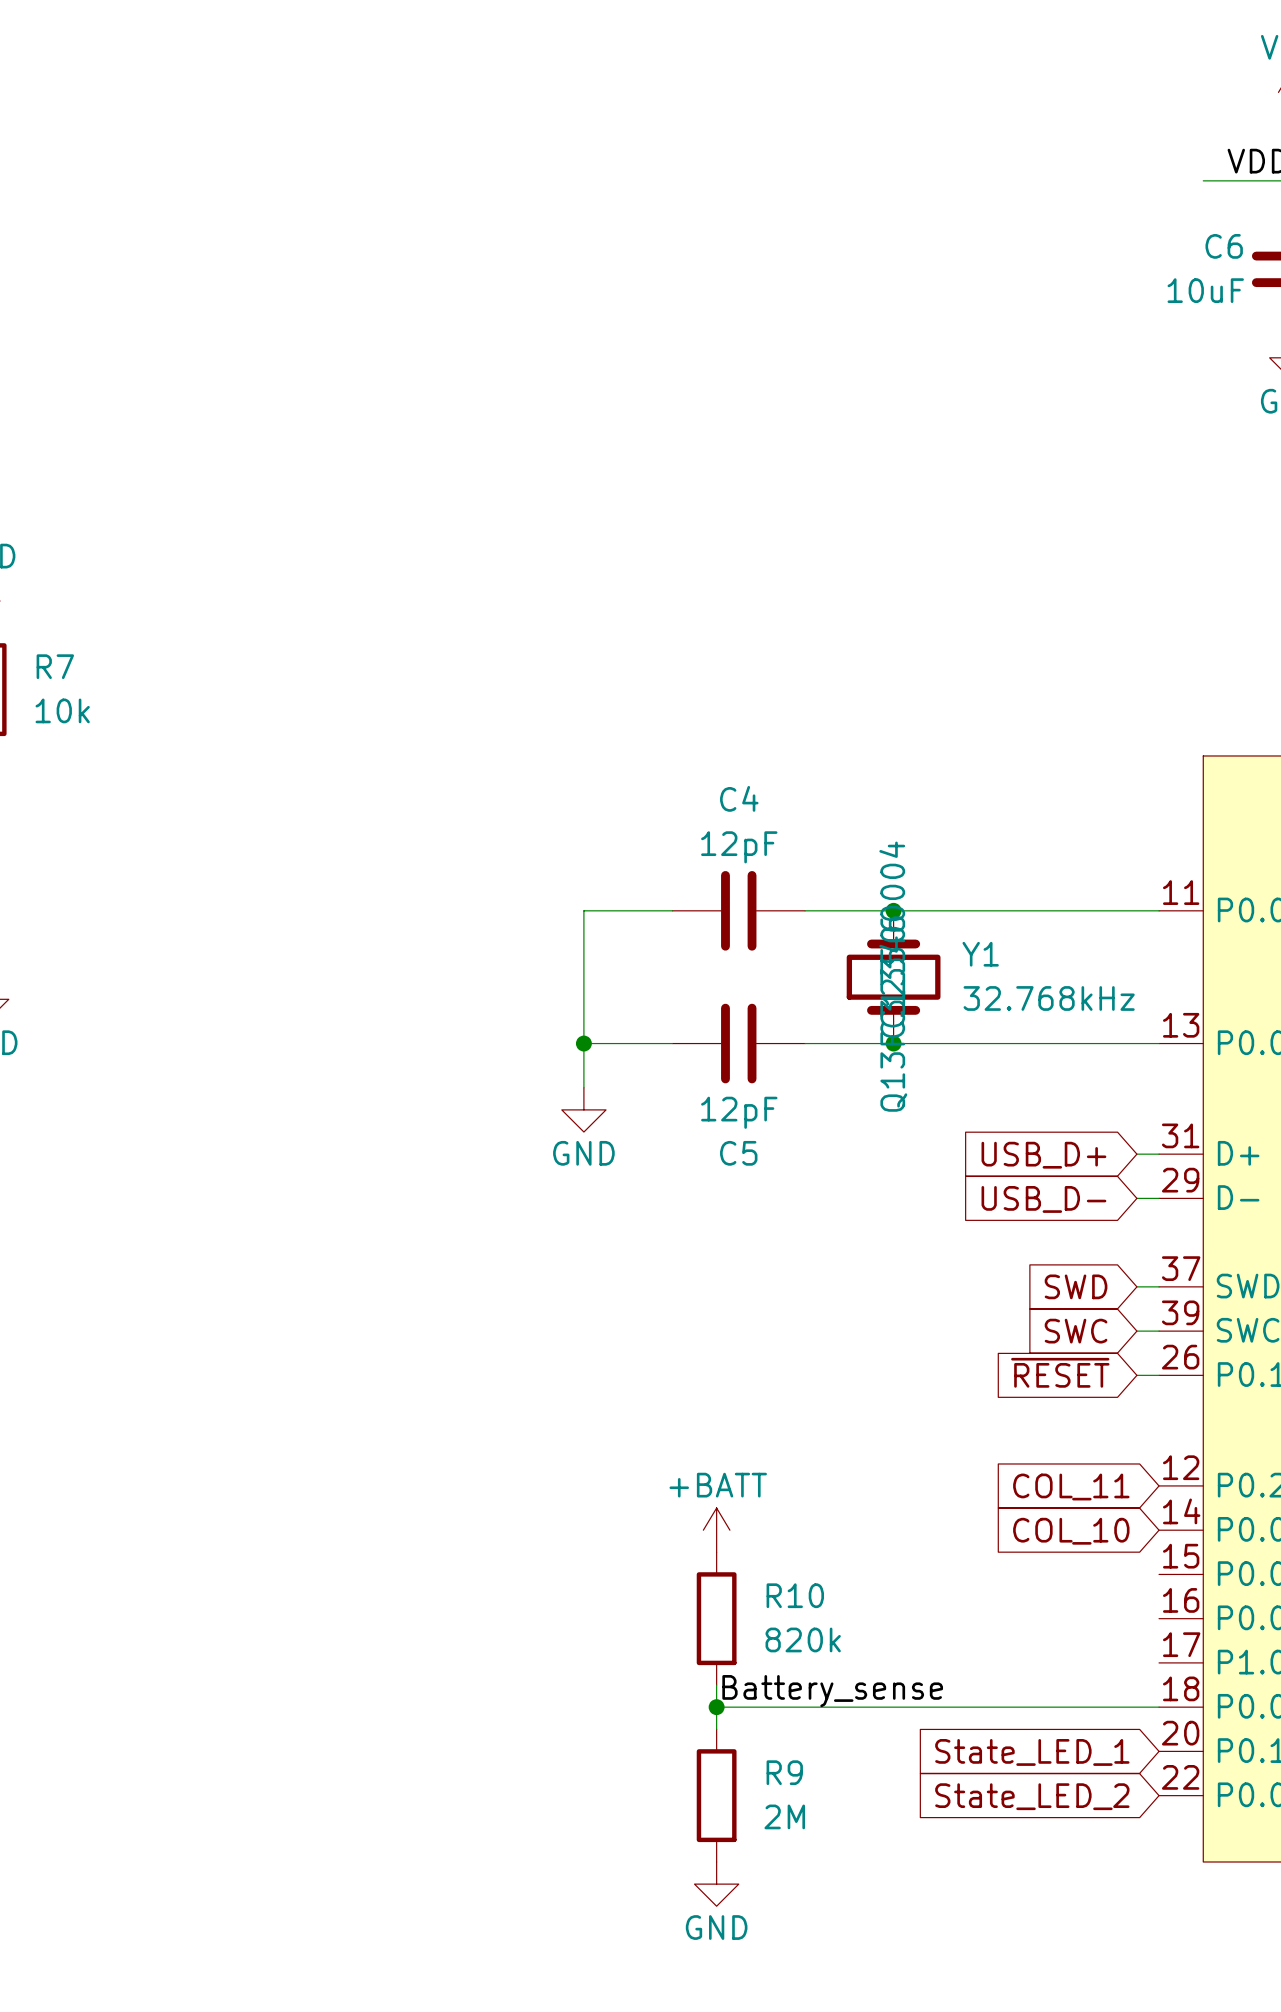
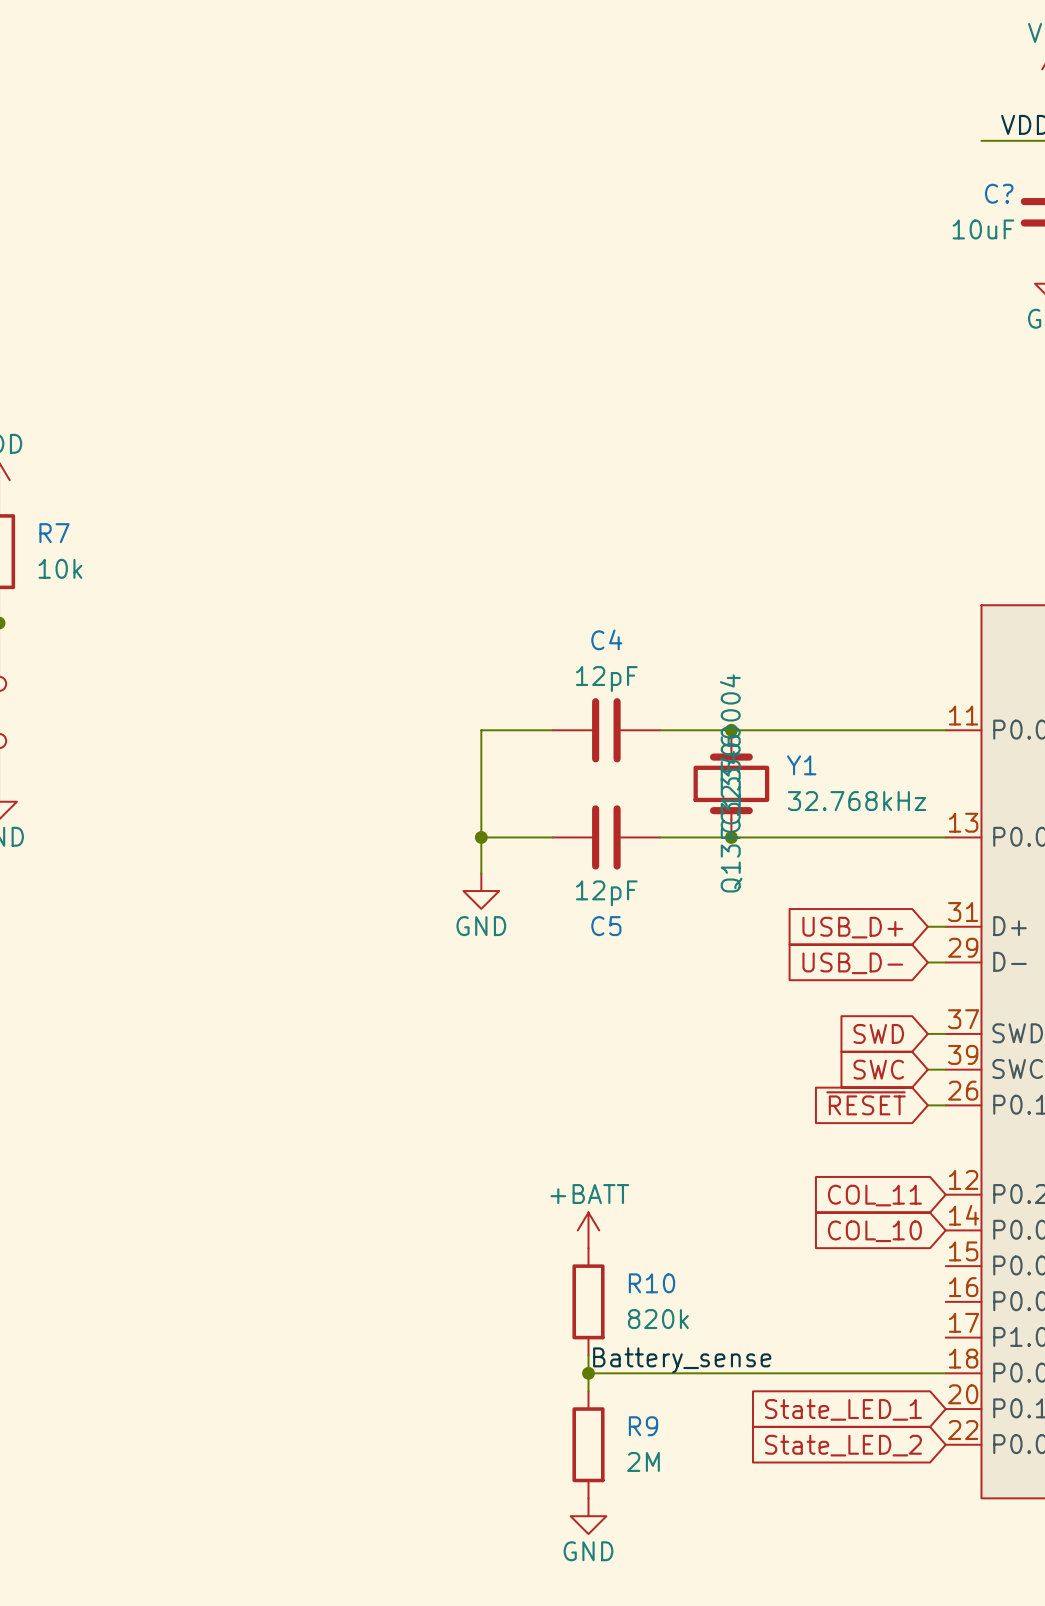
C6 name: C6 (1224, 246) -> C? (999, 193)

